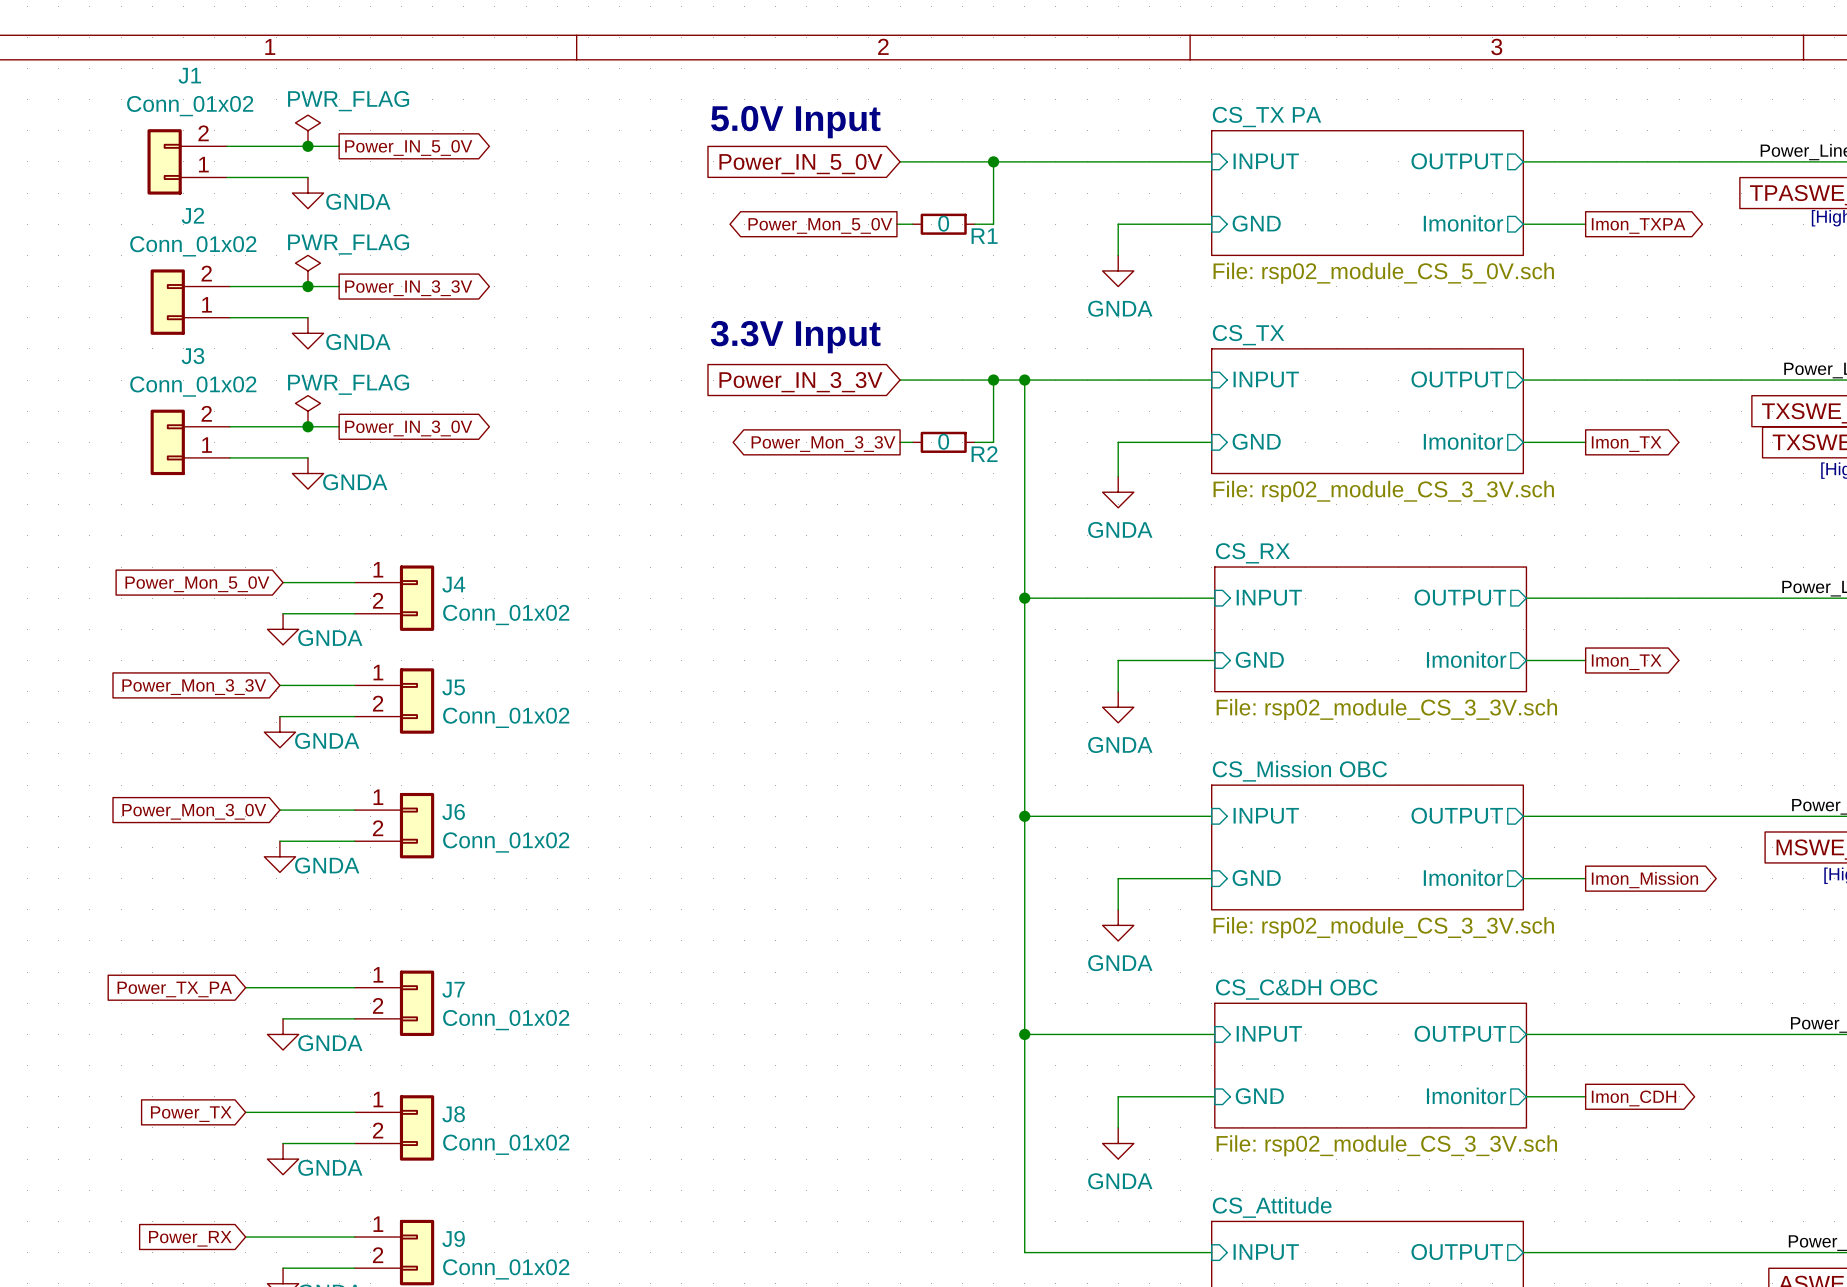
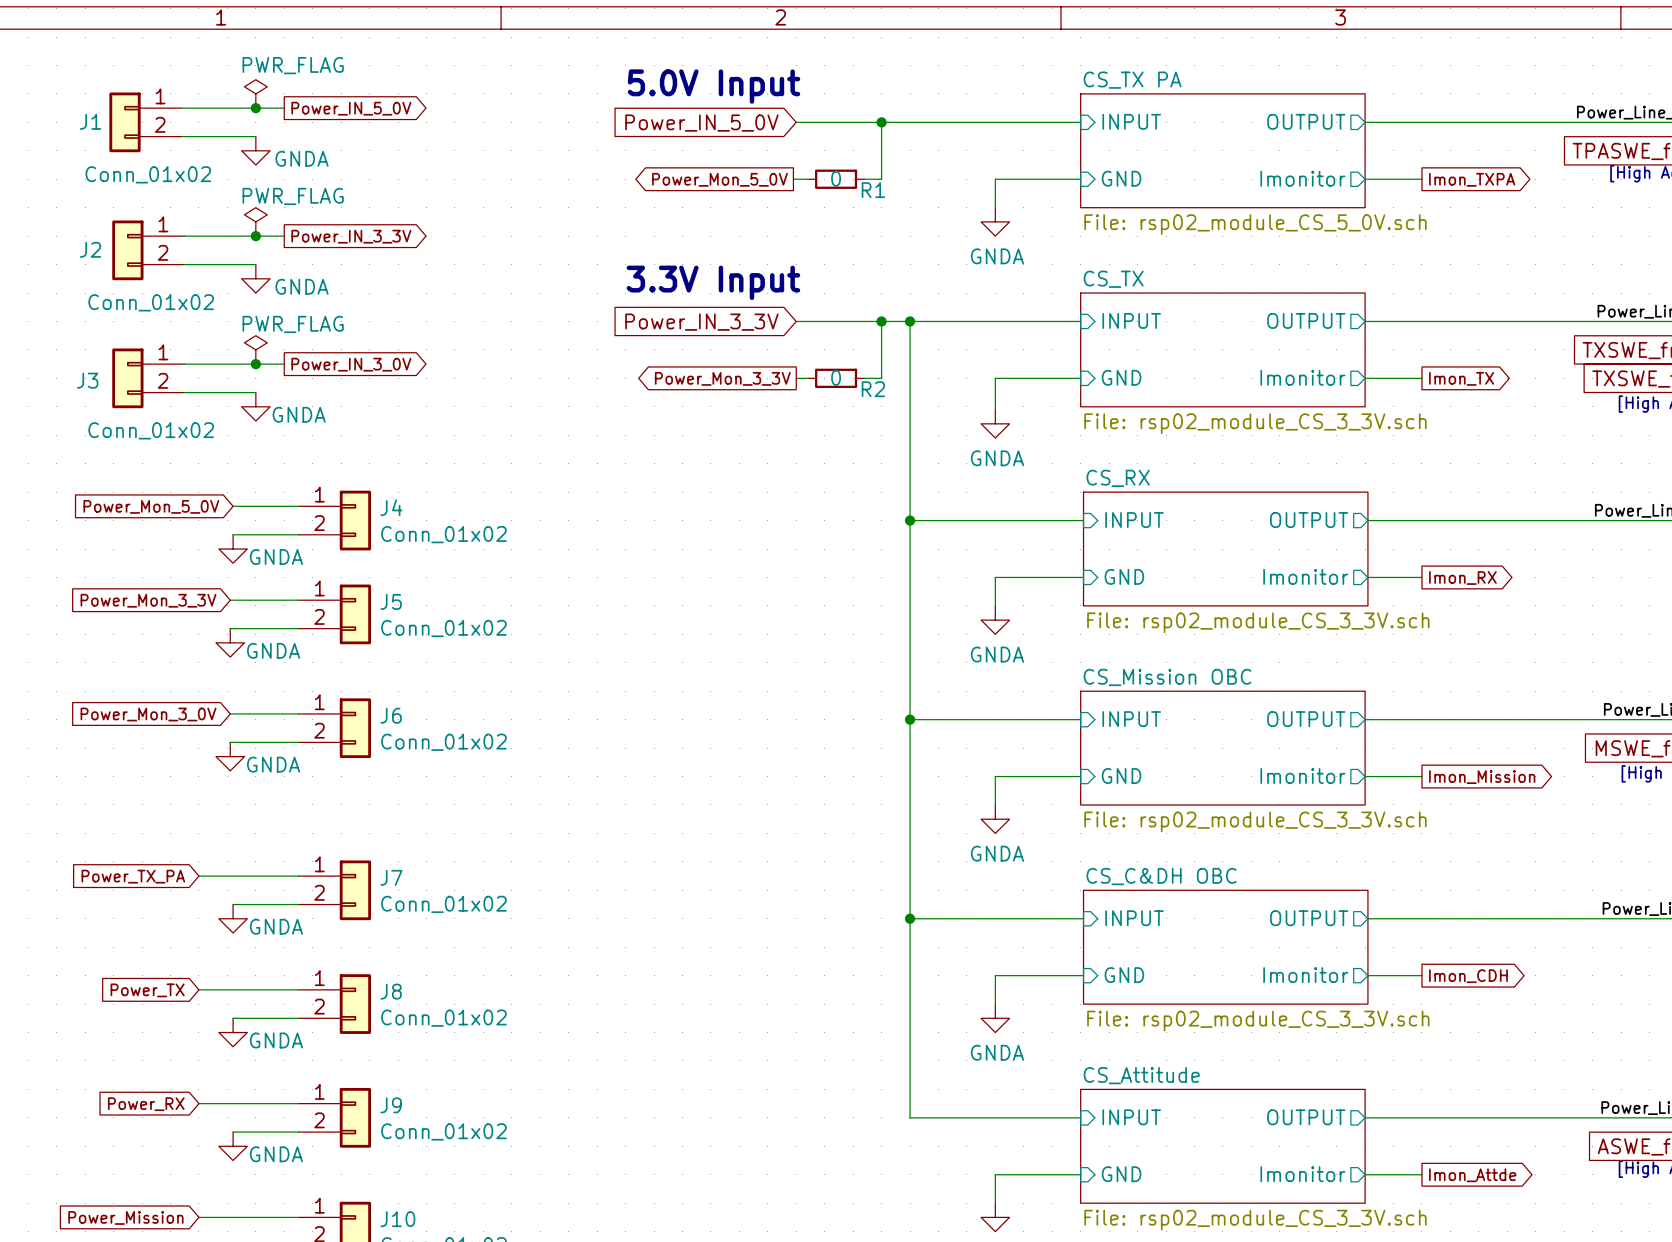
J1 name position: J1 (189, 75) -> J1 (90, 121)
J1 flip: as is (164, 161) -> up-down (125, 122)
J2 name position: J2 (192, 215) -> J2 (90, 249)
J2 flip: as is (167, 302) -> up-down (127, 250)
J3 name position: J3 (192, 356) -> J3 (87, 380)
J3 flip: as is (167, 442) -> up-down (127, 378)
global label: Imon_TX (1626, 662) -> Imon_RX (1462, 577)

